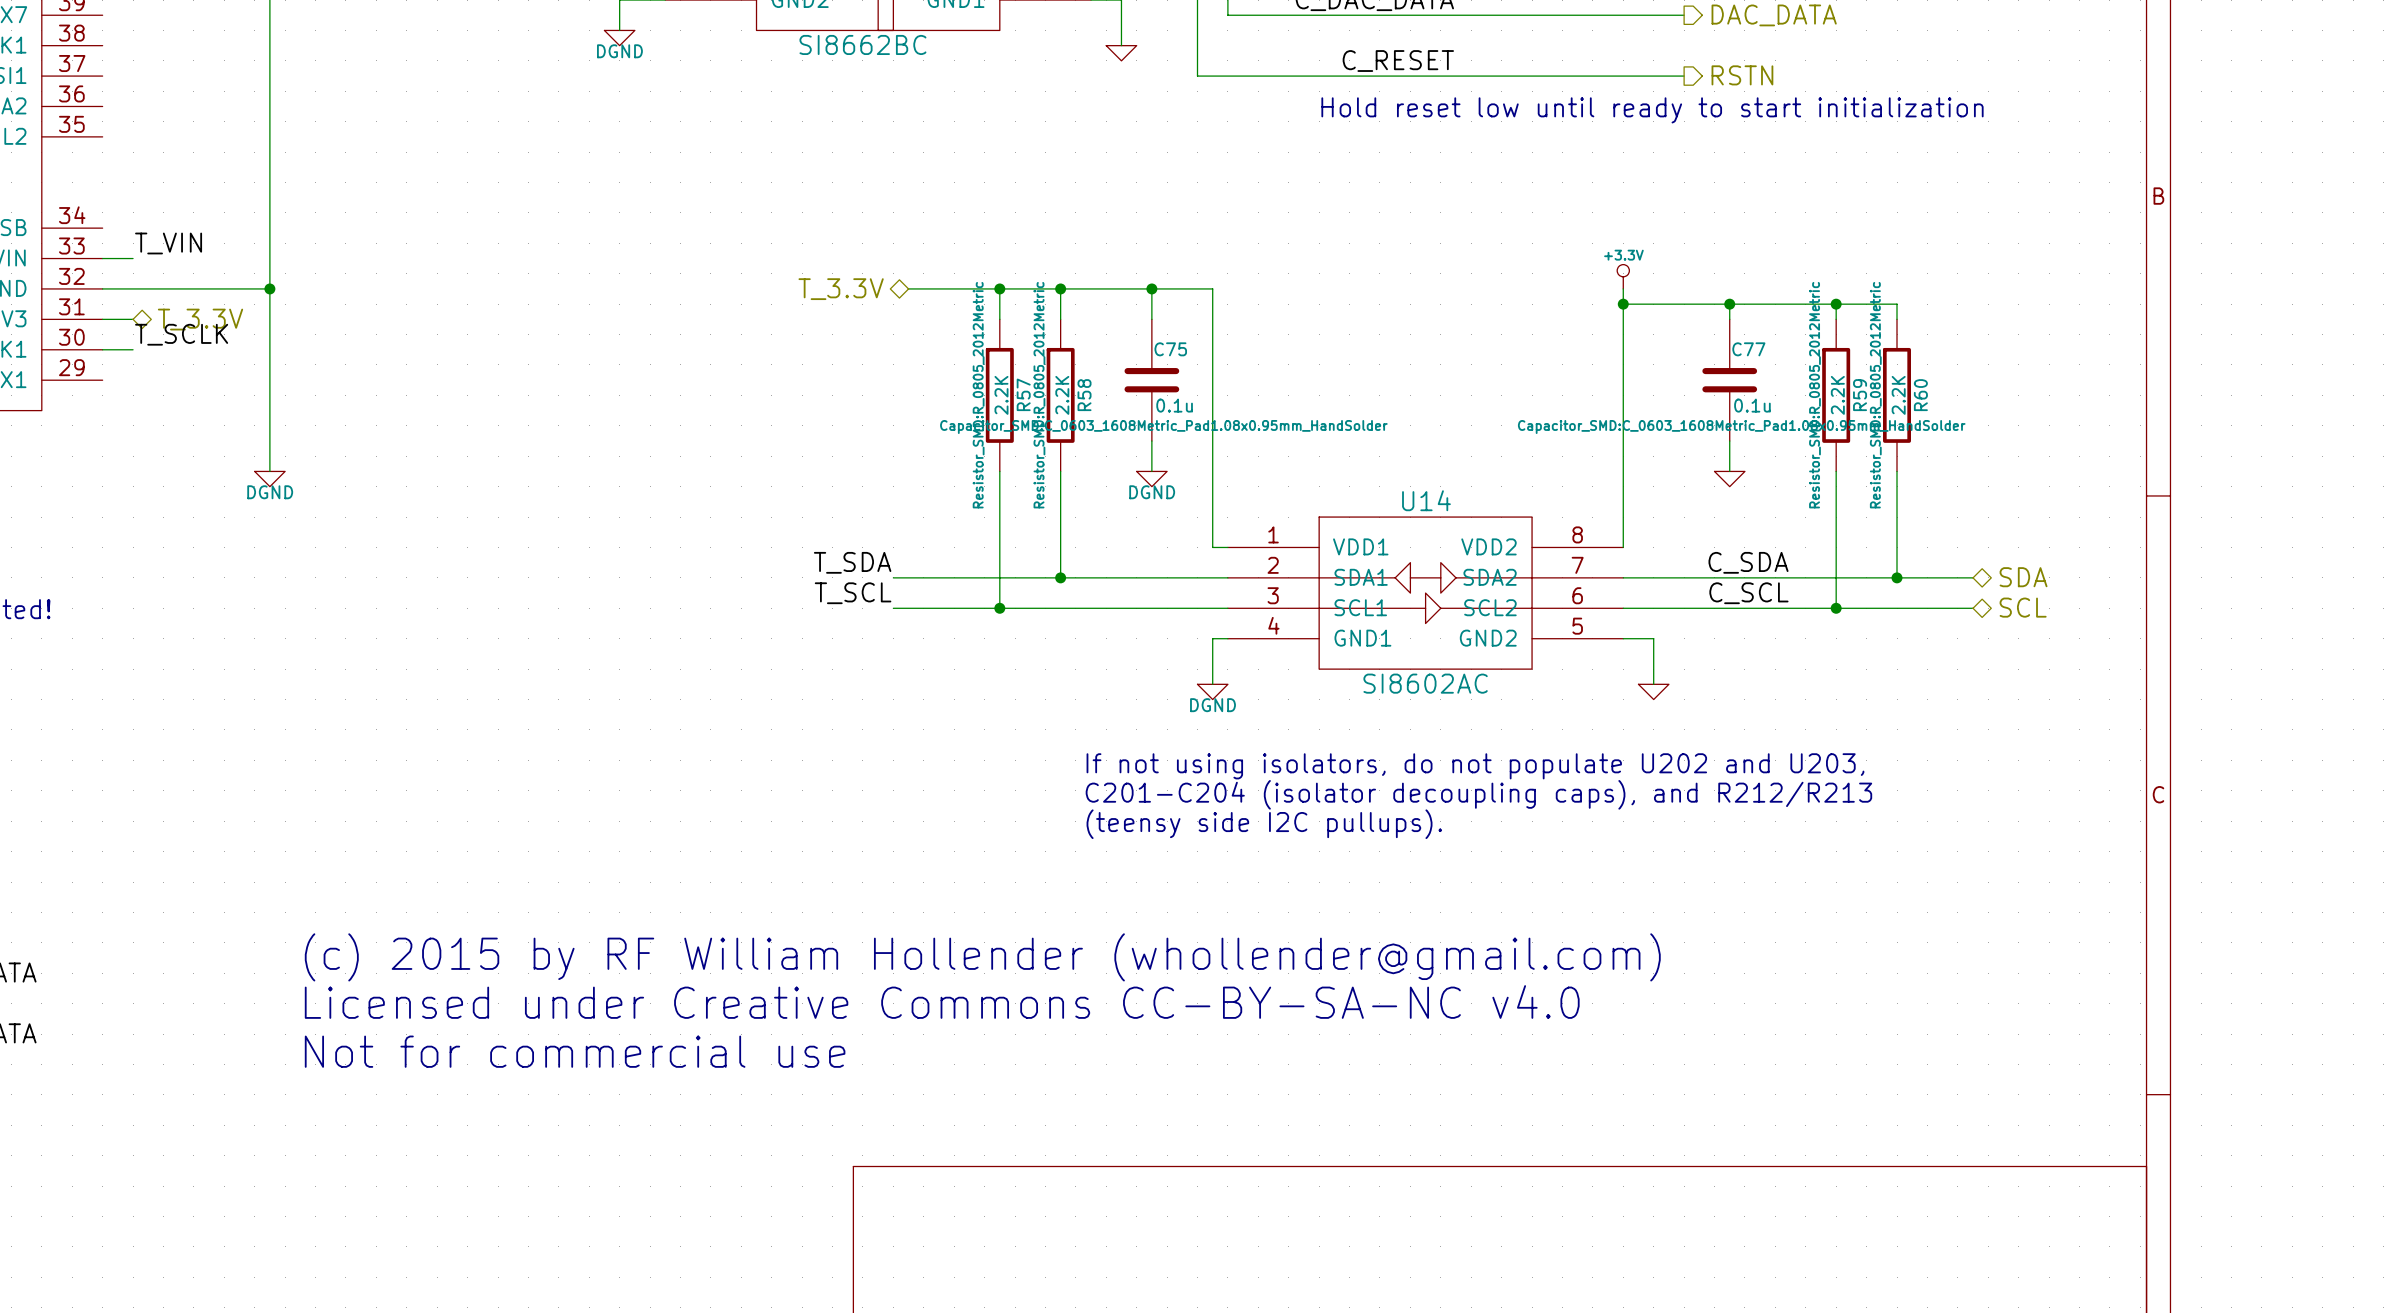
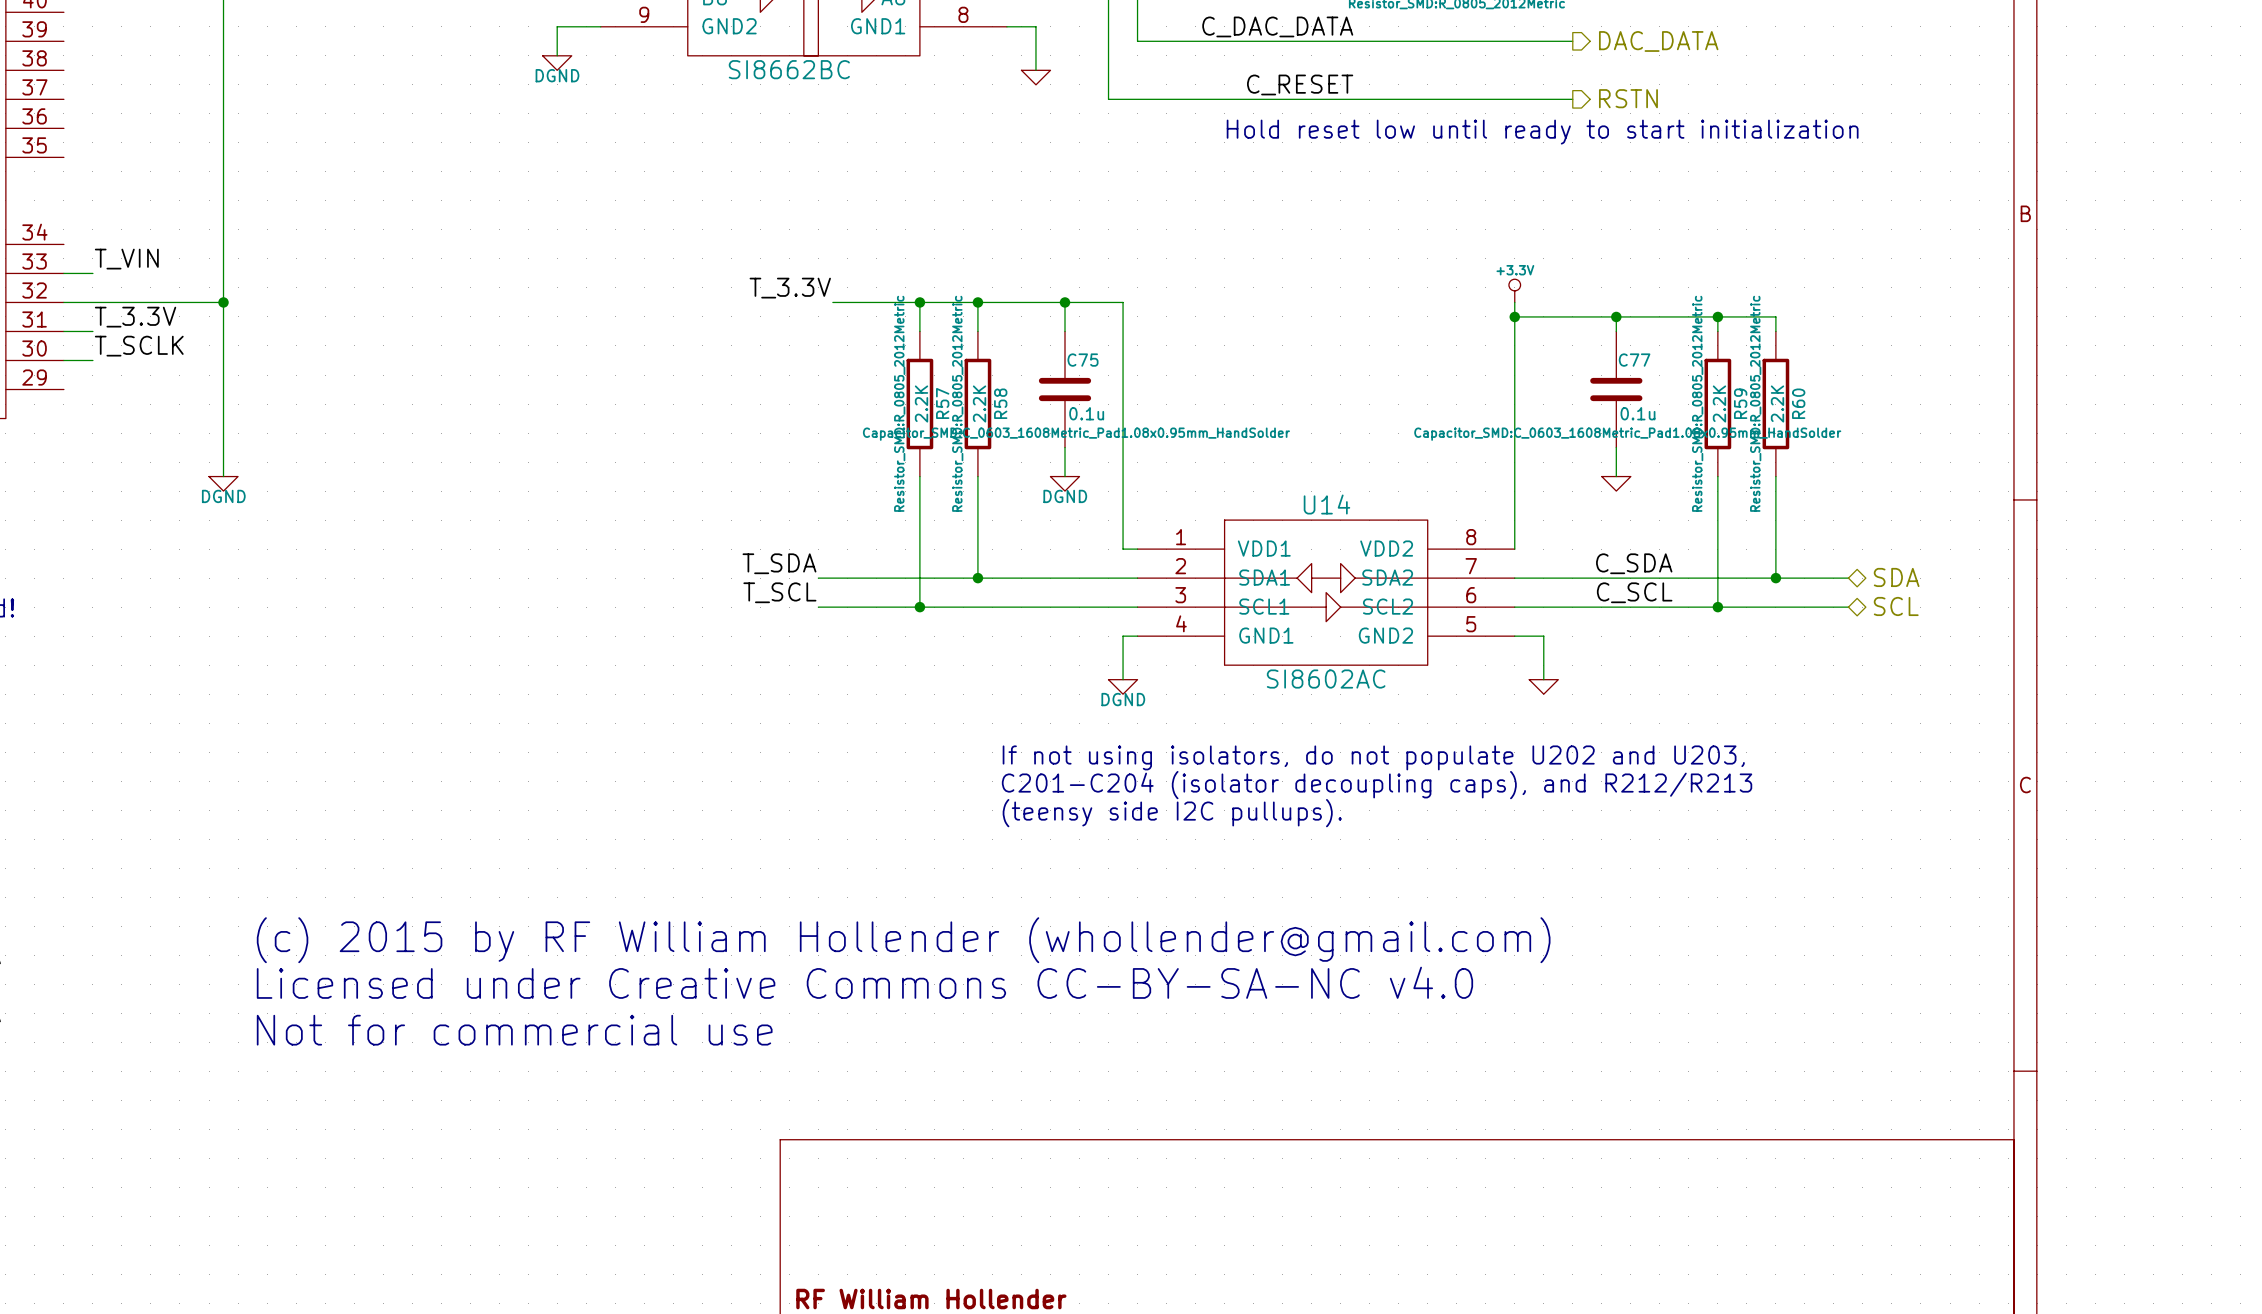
label: none -> T_3.3V (790, 288)
hierarchical label: T_3.3V (841, 289) -> none
label: none -> T_3.3V (135, 317)
hierarchical label: T_3.3V (200, 319) -> none

